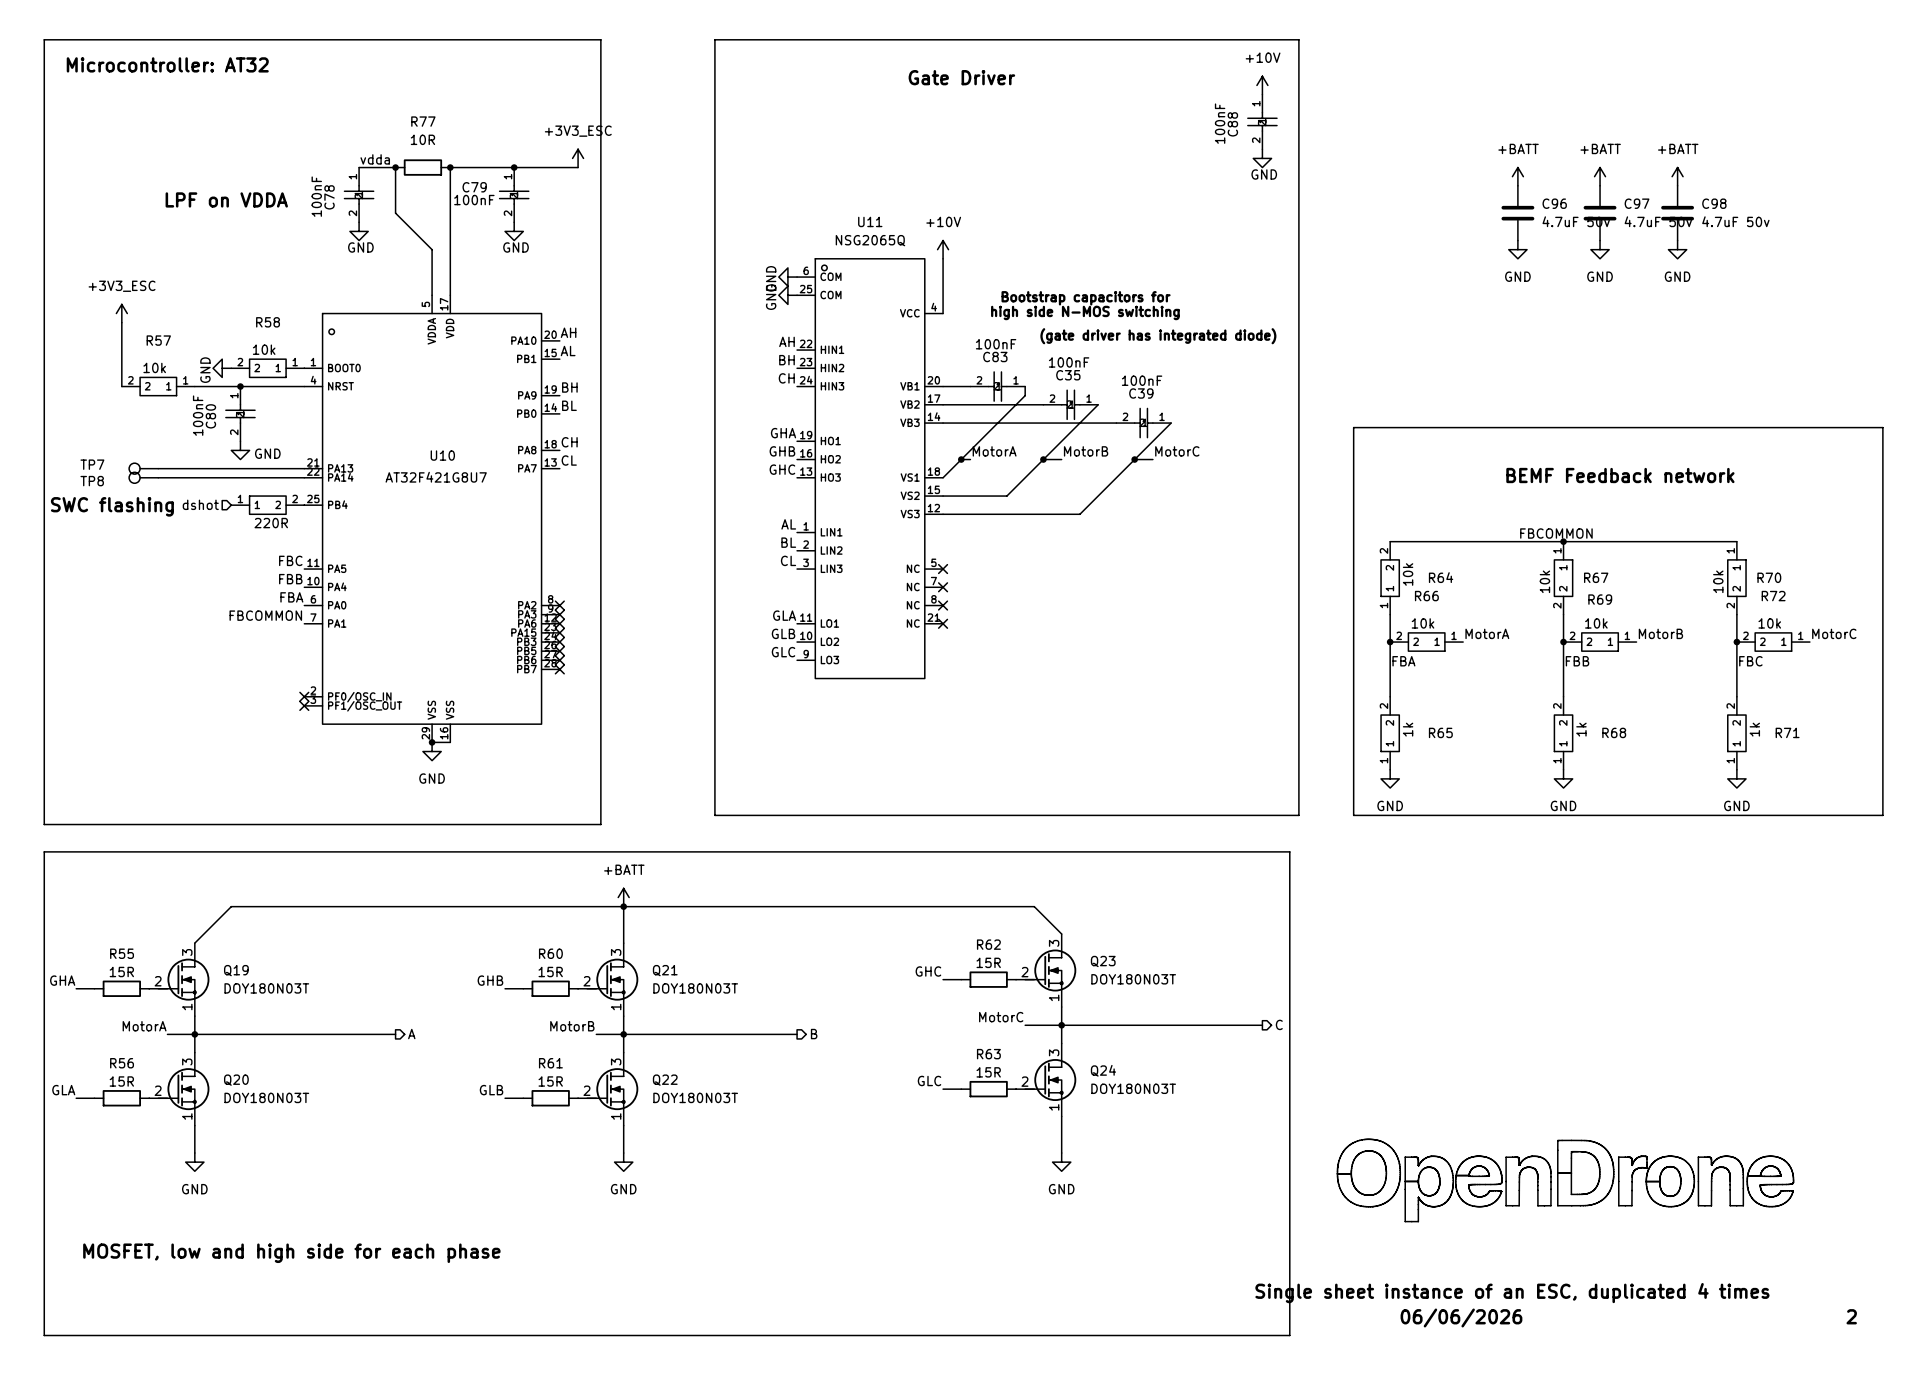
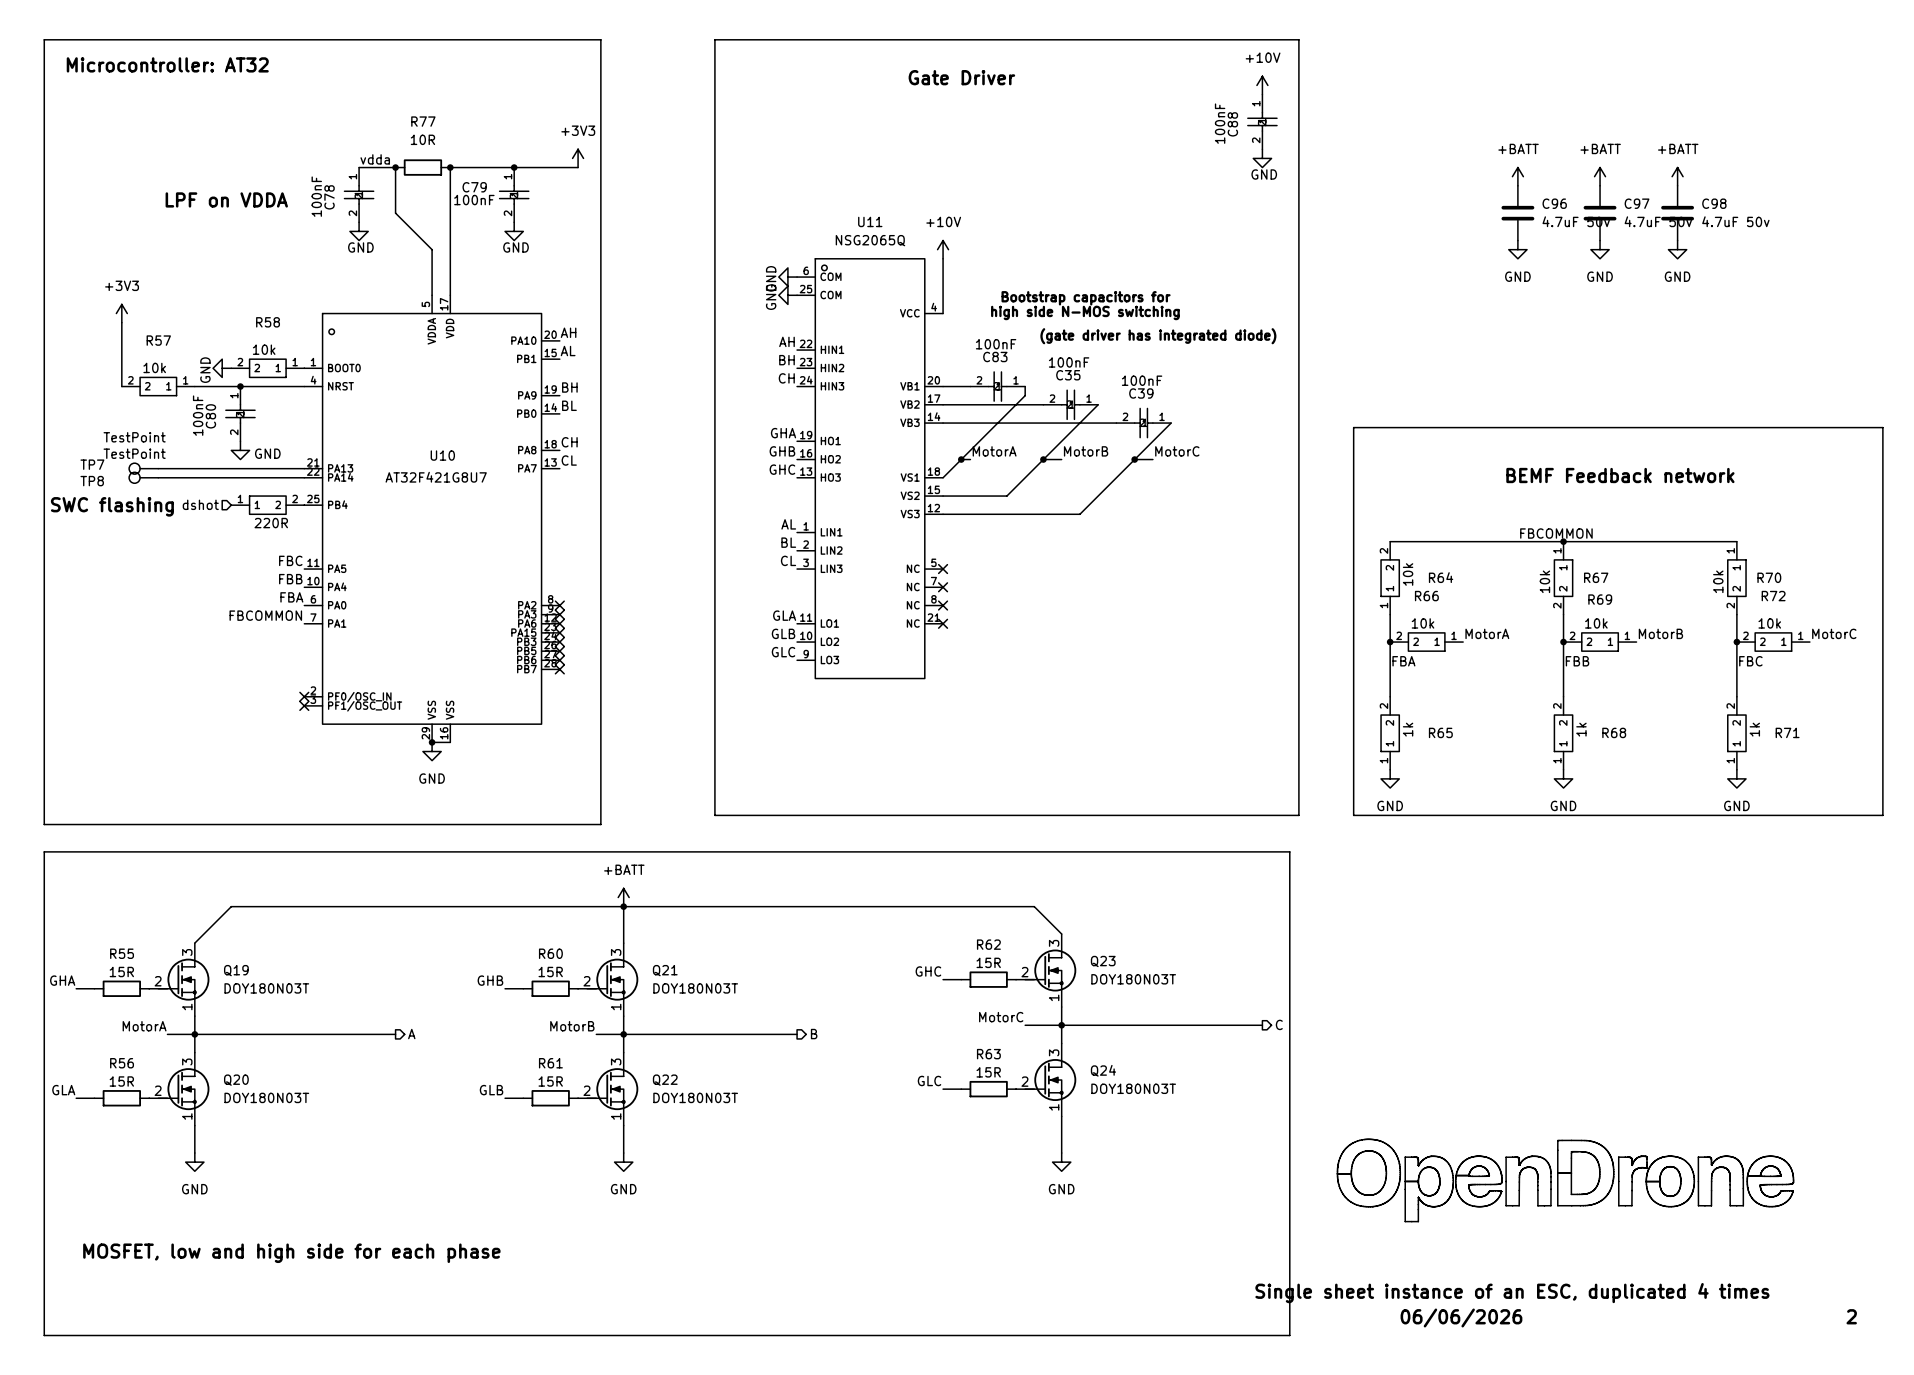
power symbol: +3V3_ESC (578, 158) -> +3V3 (578, 158)
power symbol: +3V3_ESC (121, 313) -> +3V3 (121, 313)
TP7 value: none -> TestPoint (134, 437)
TP8 value: none -> TestPoint (134, 453)

